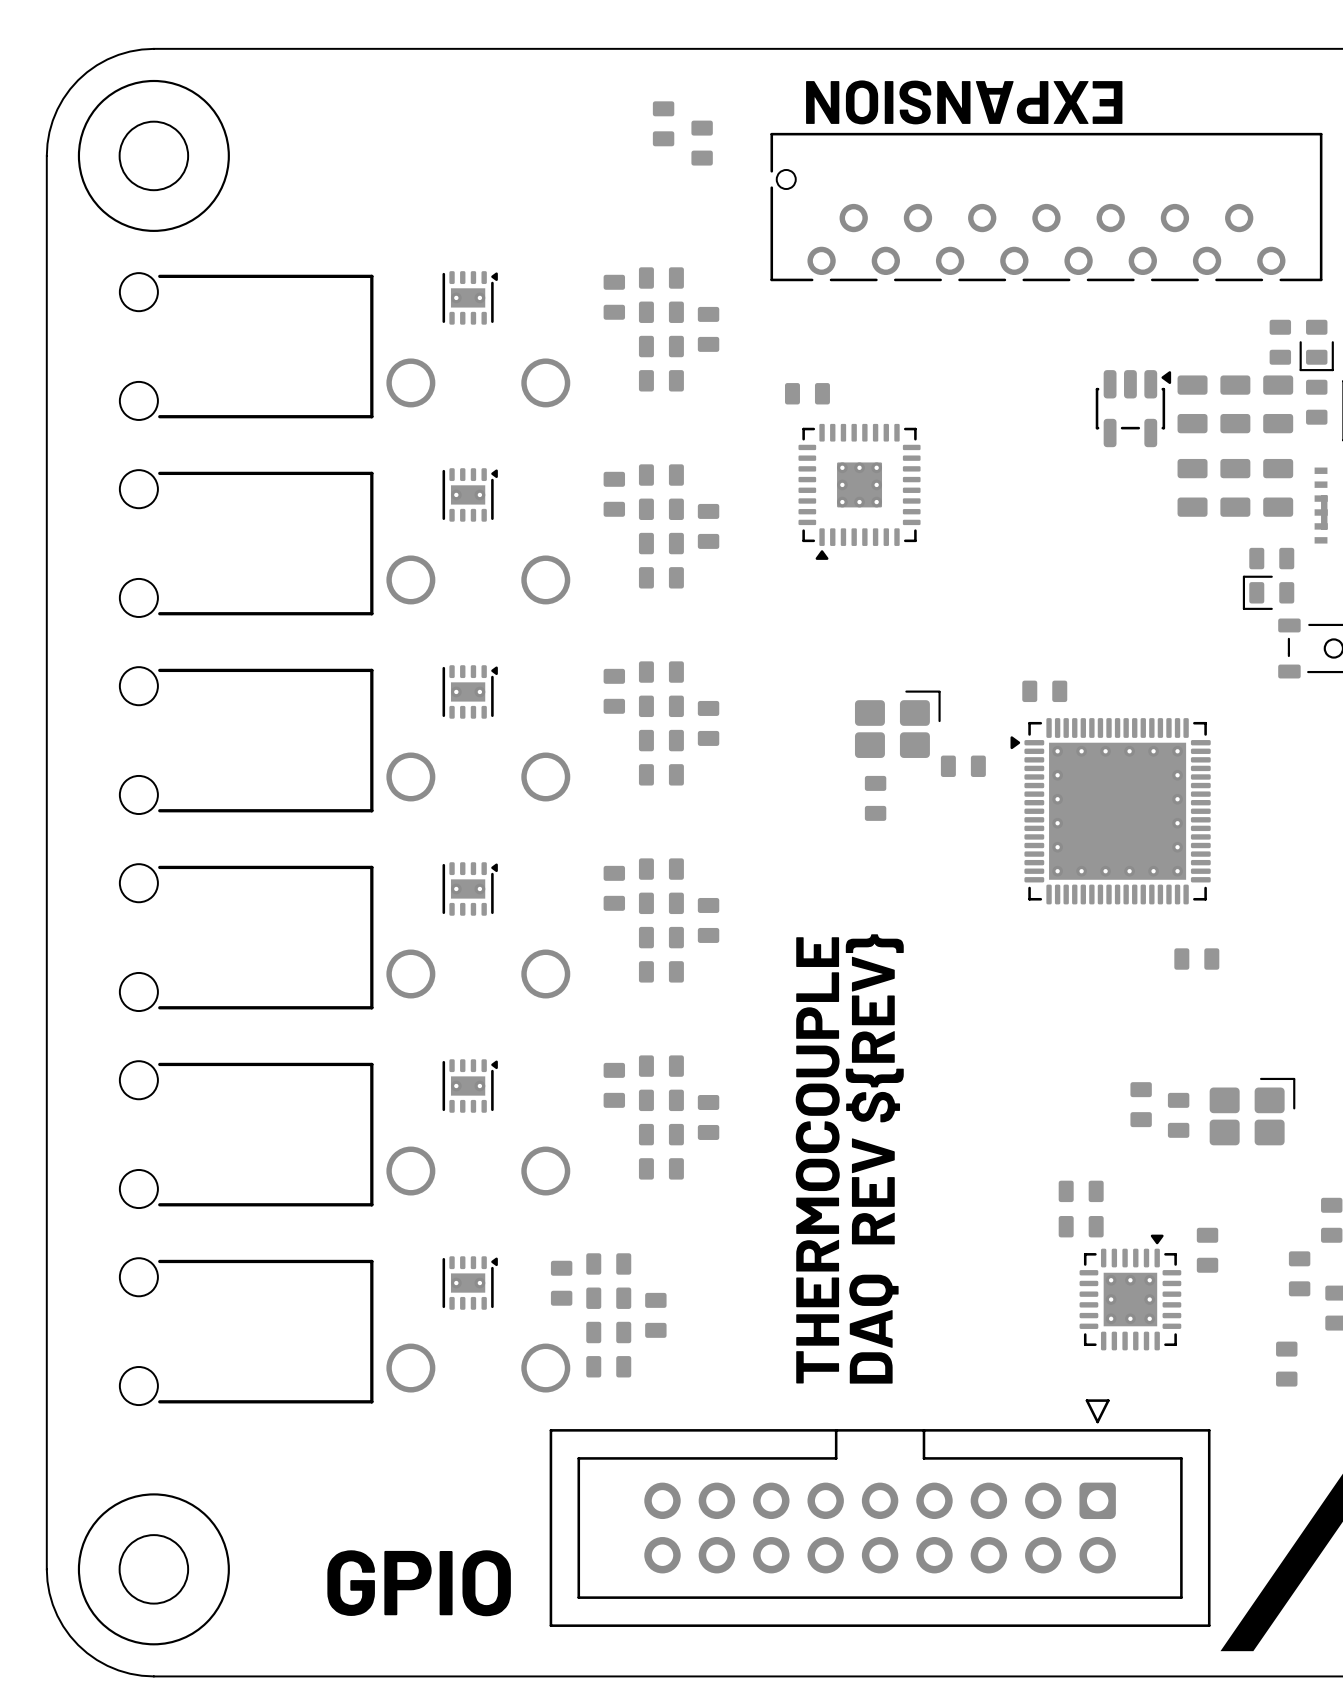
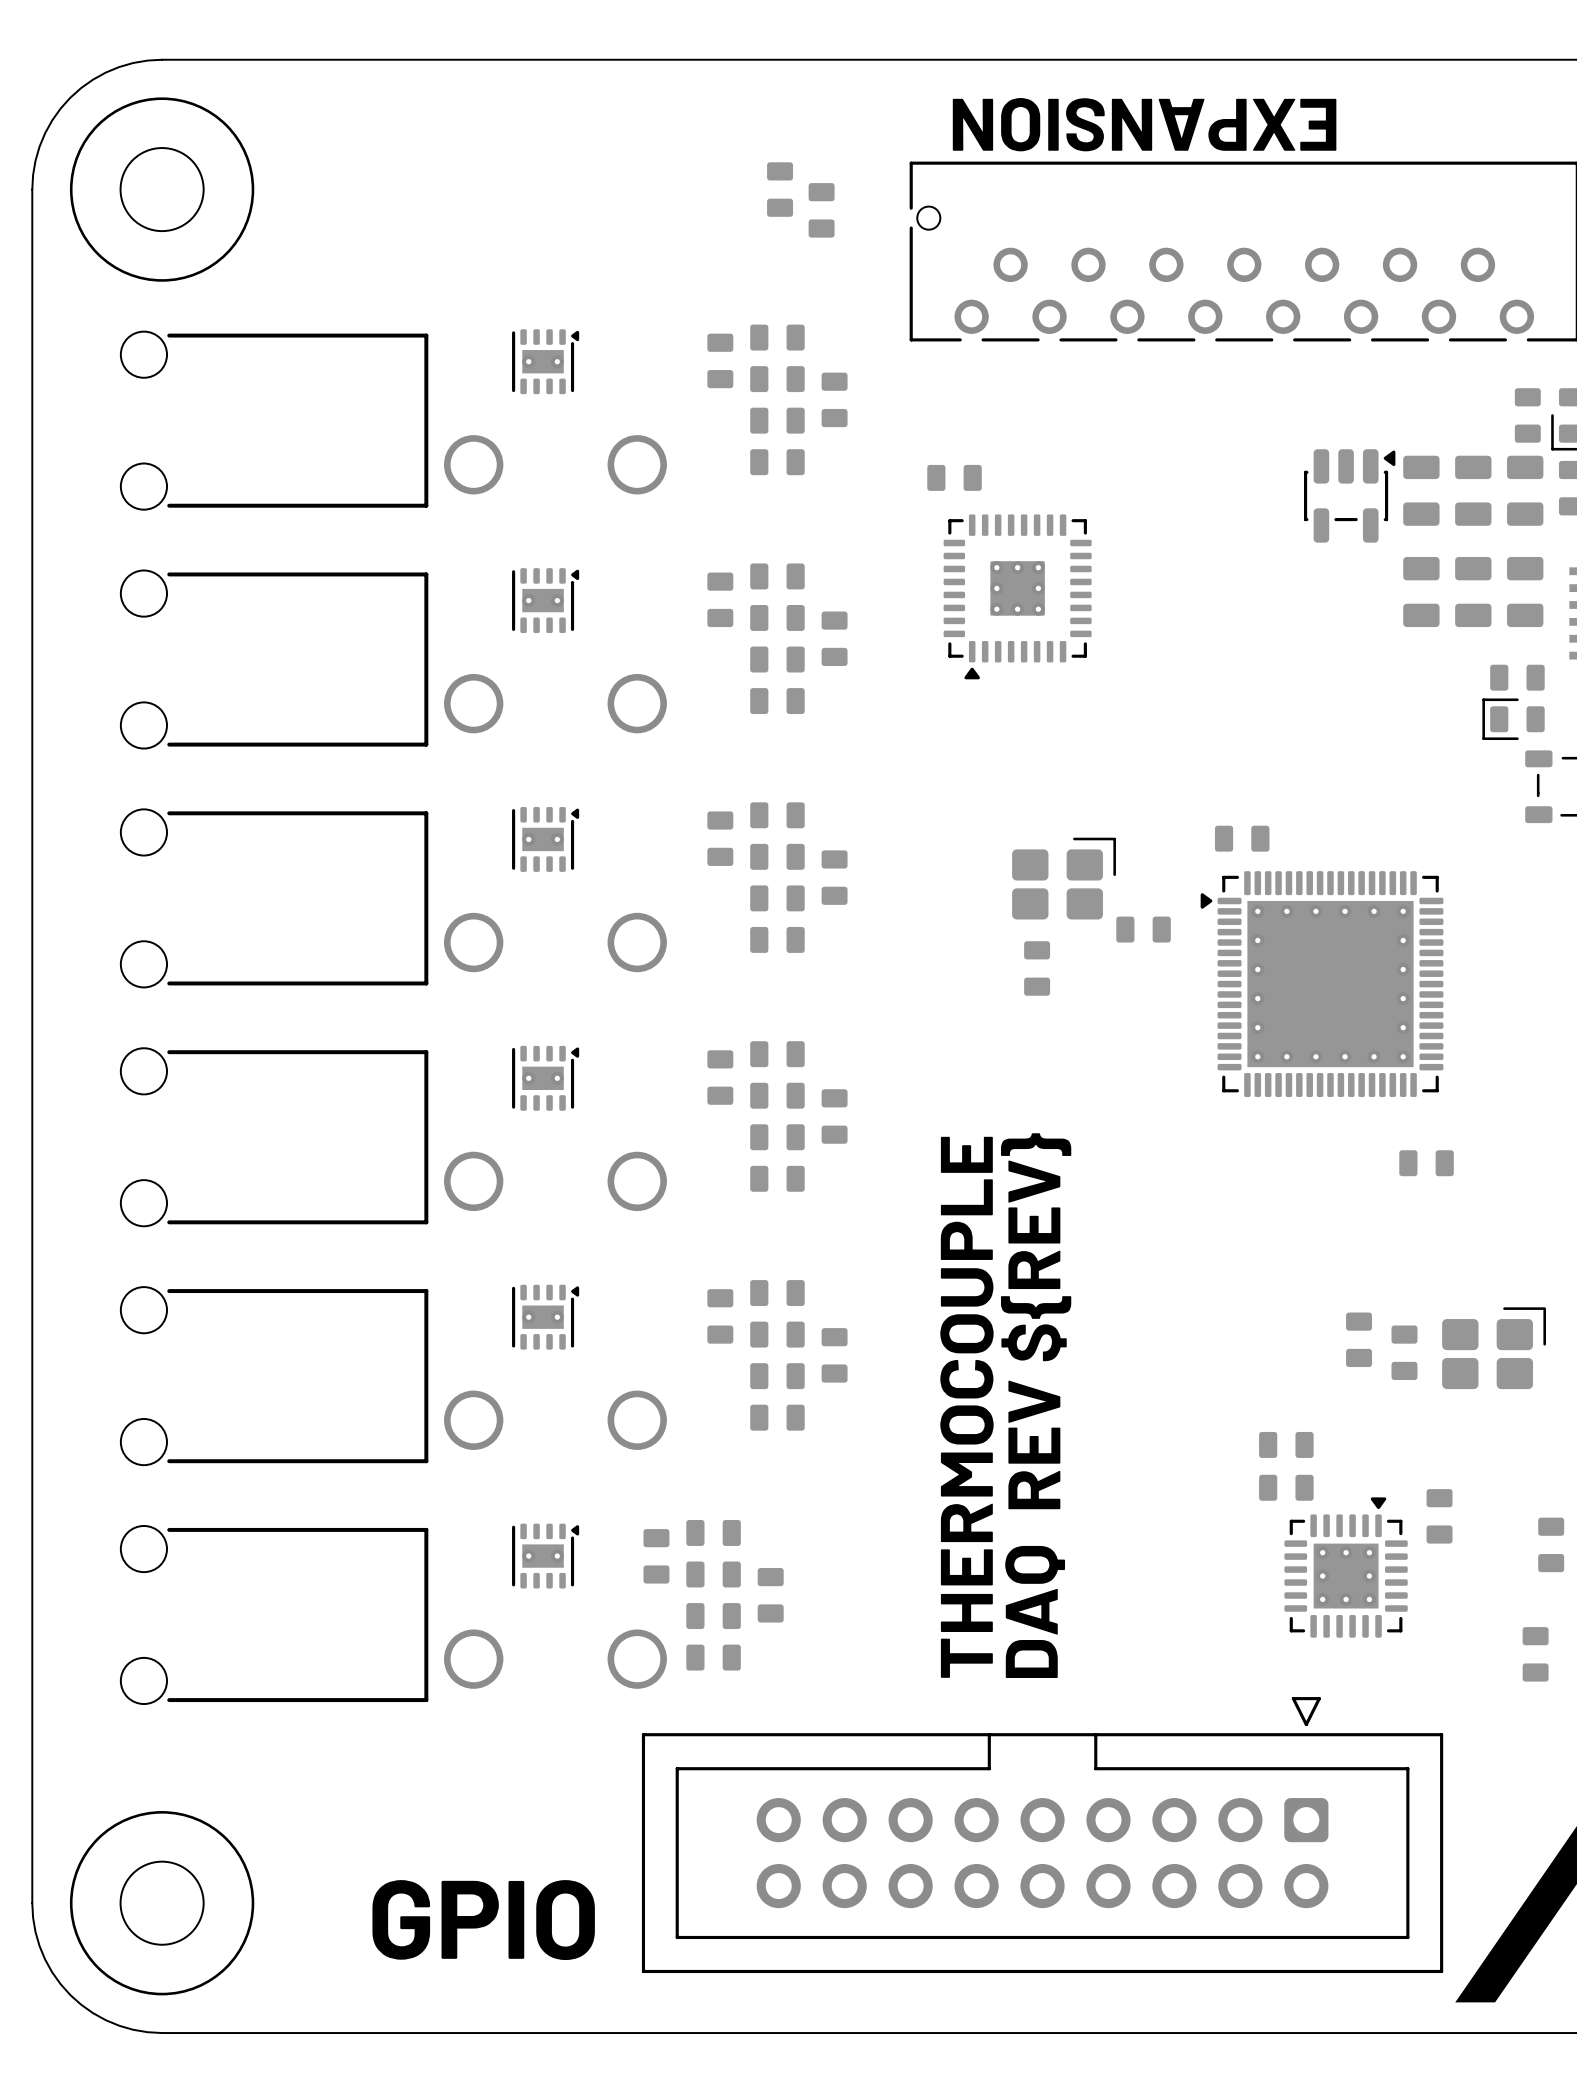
part: (663, 123) -> none
part: (702, 143) -> none
part: none -> (780, 189)
part: none -> (821, 210)

